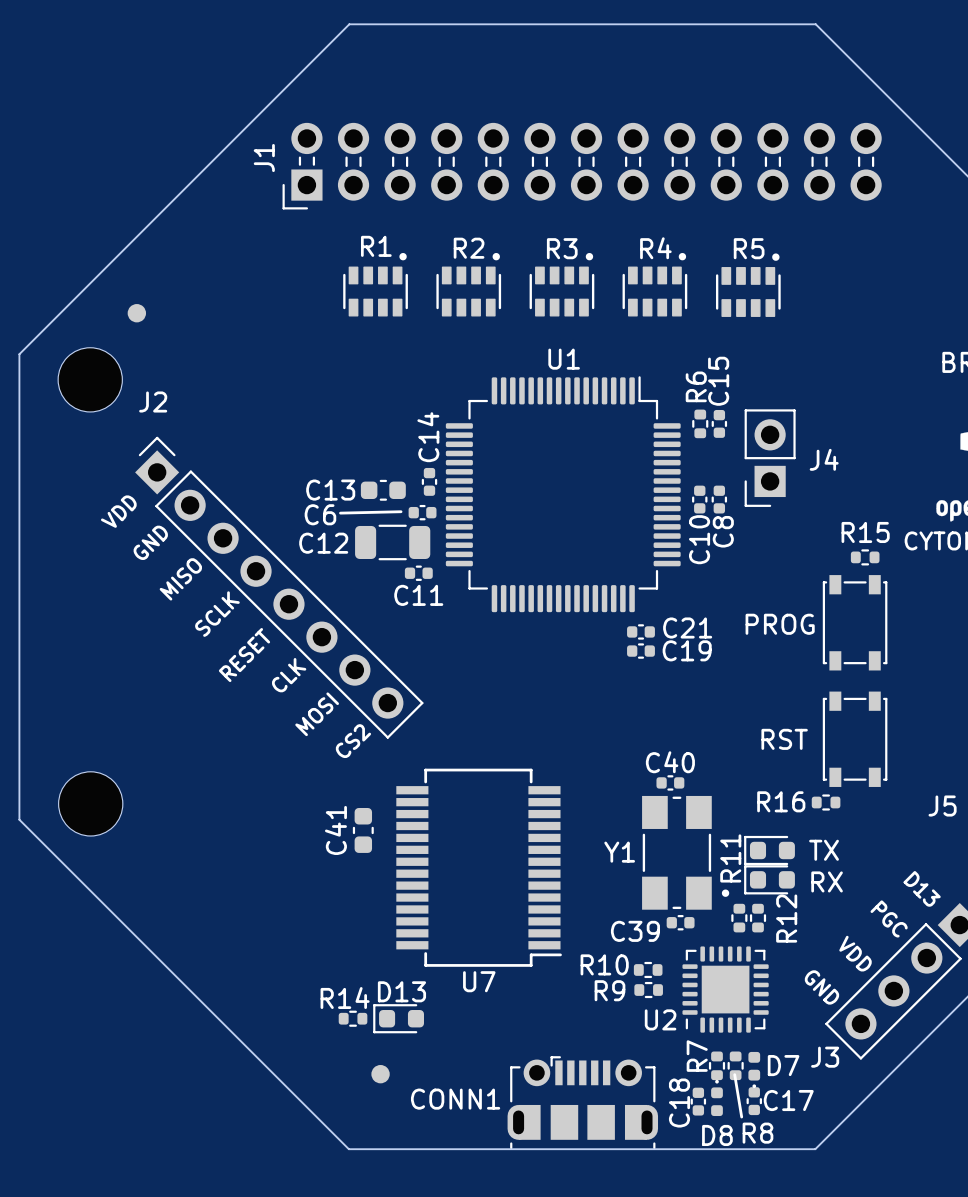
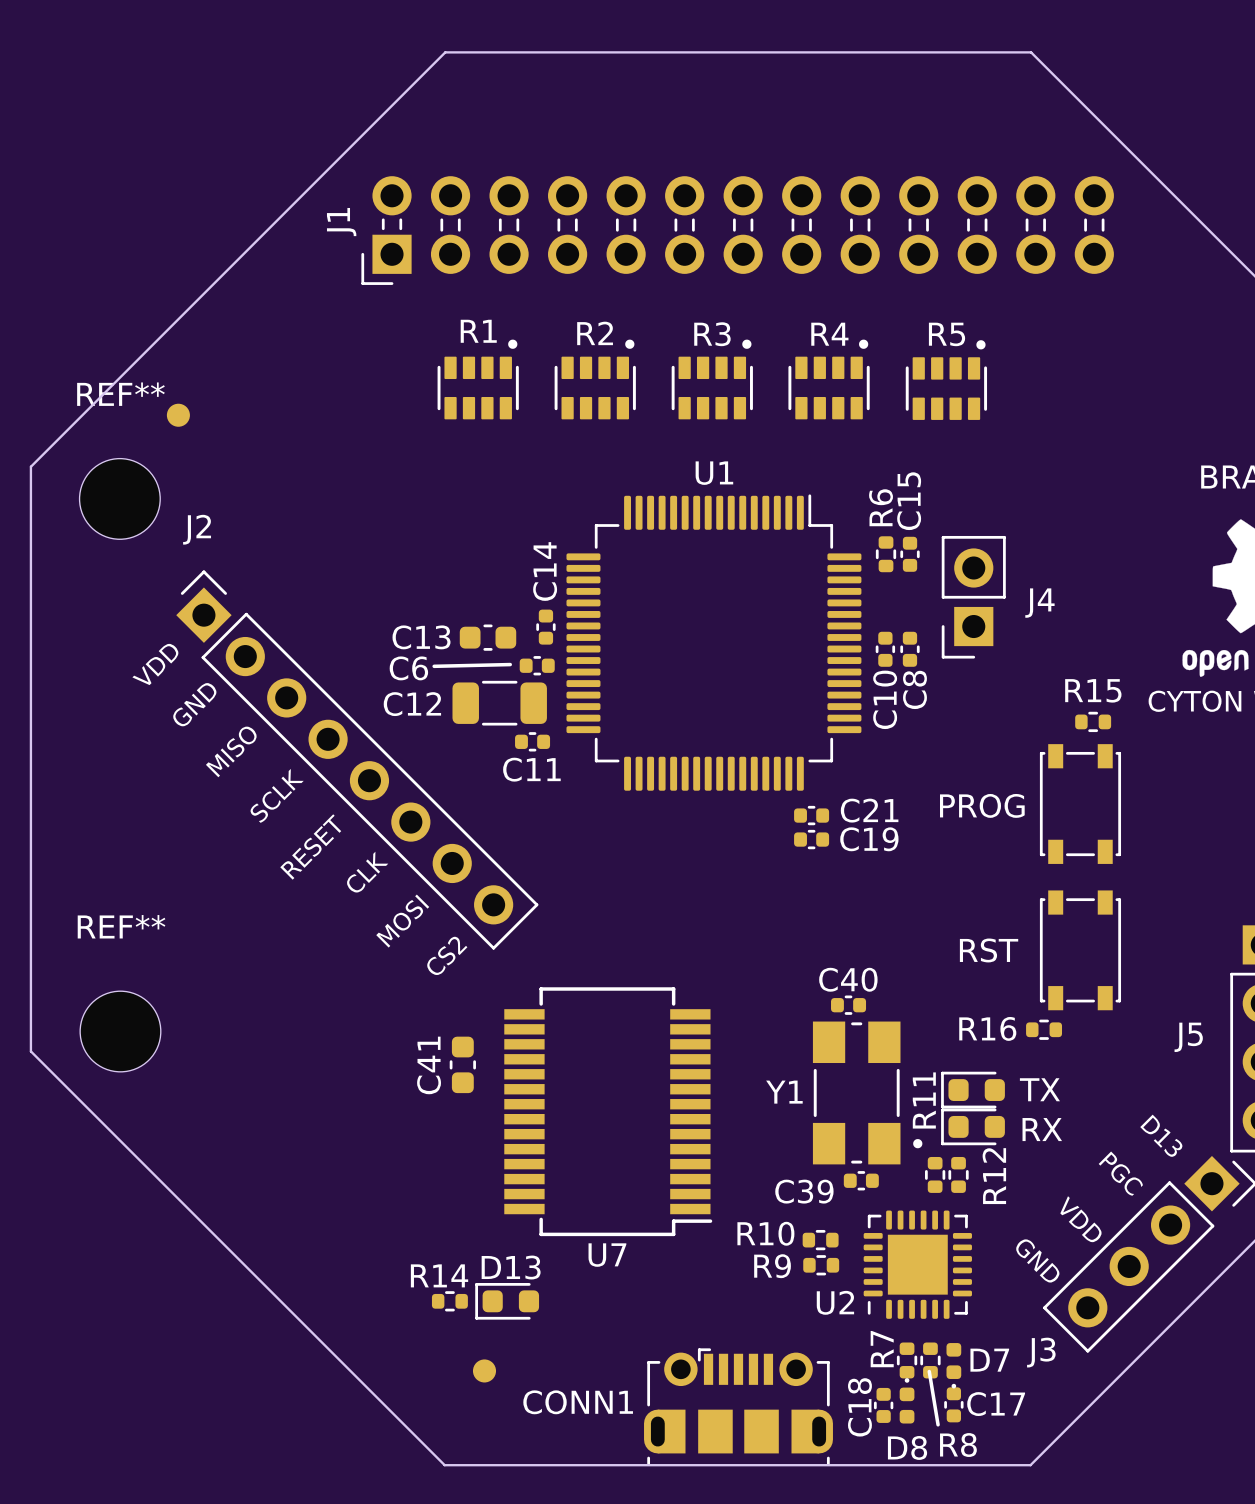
REF** name: none -> REF** (120, 394)
REF** name: none -> REF** (121, 926)

